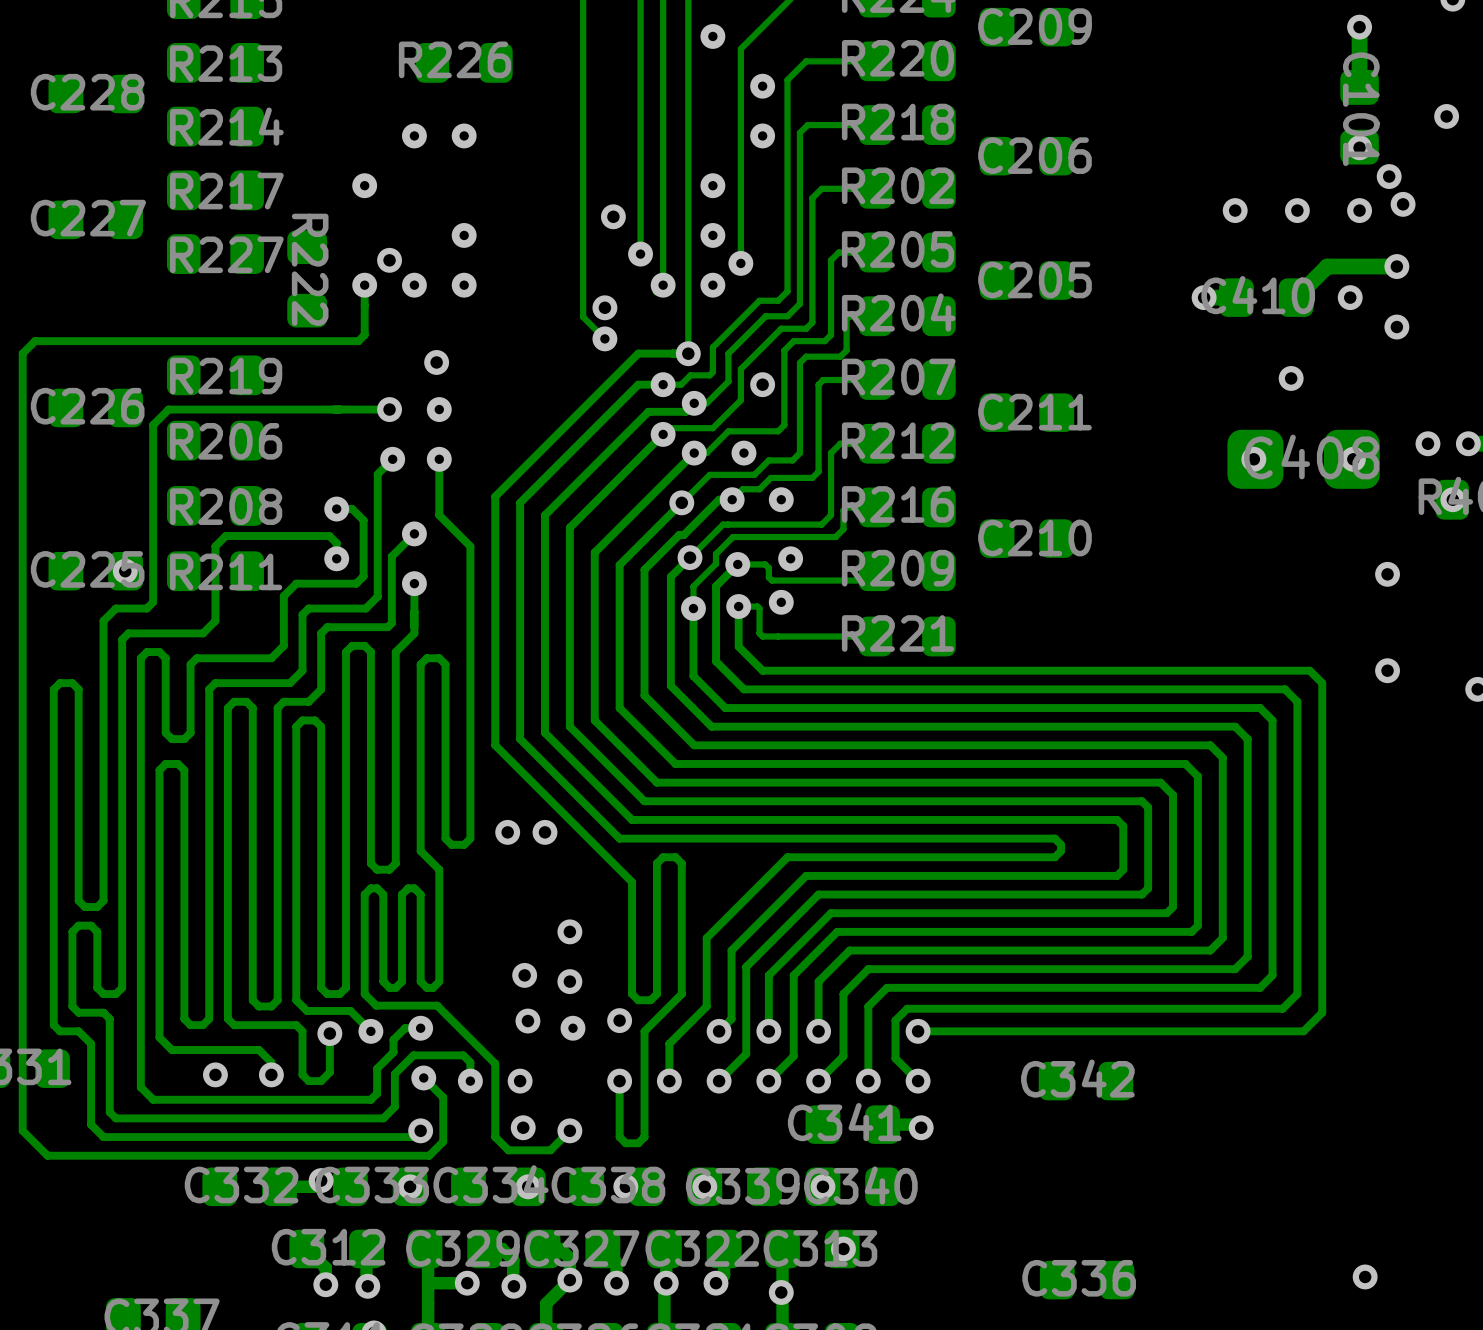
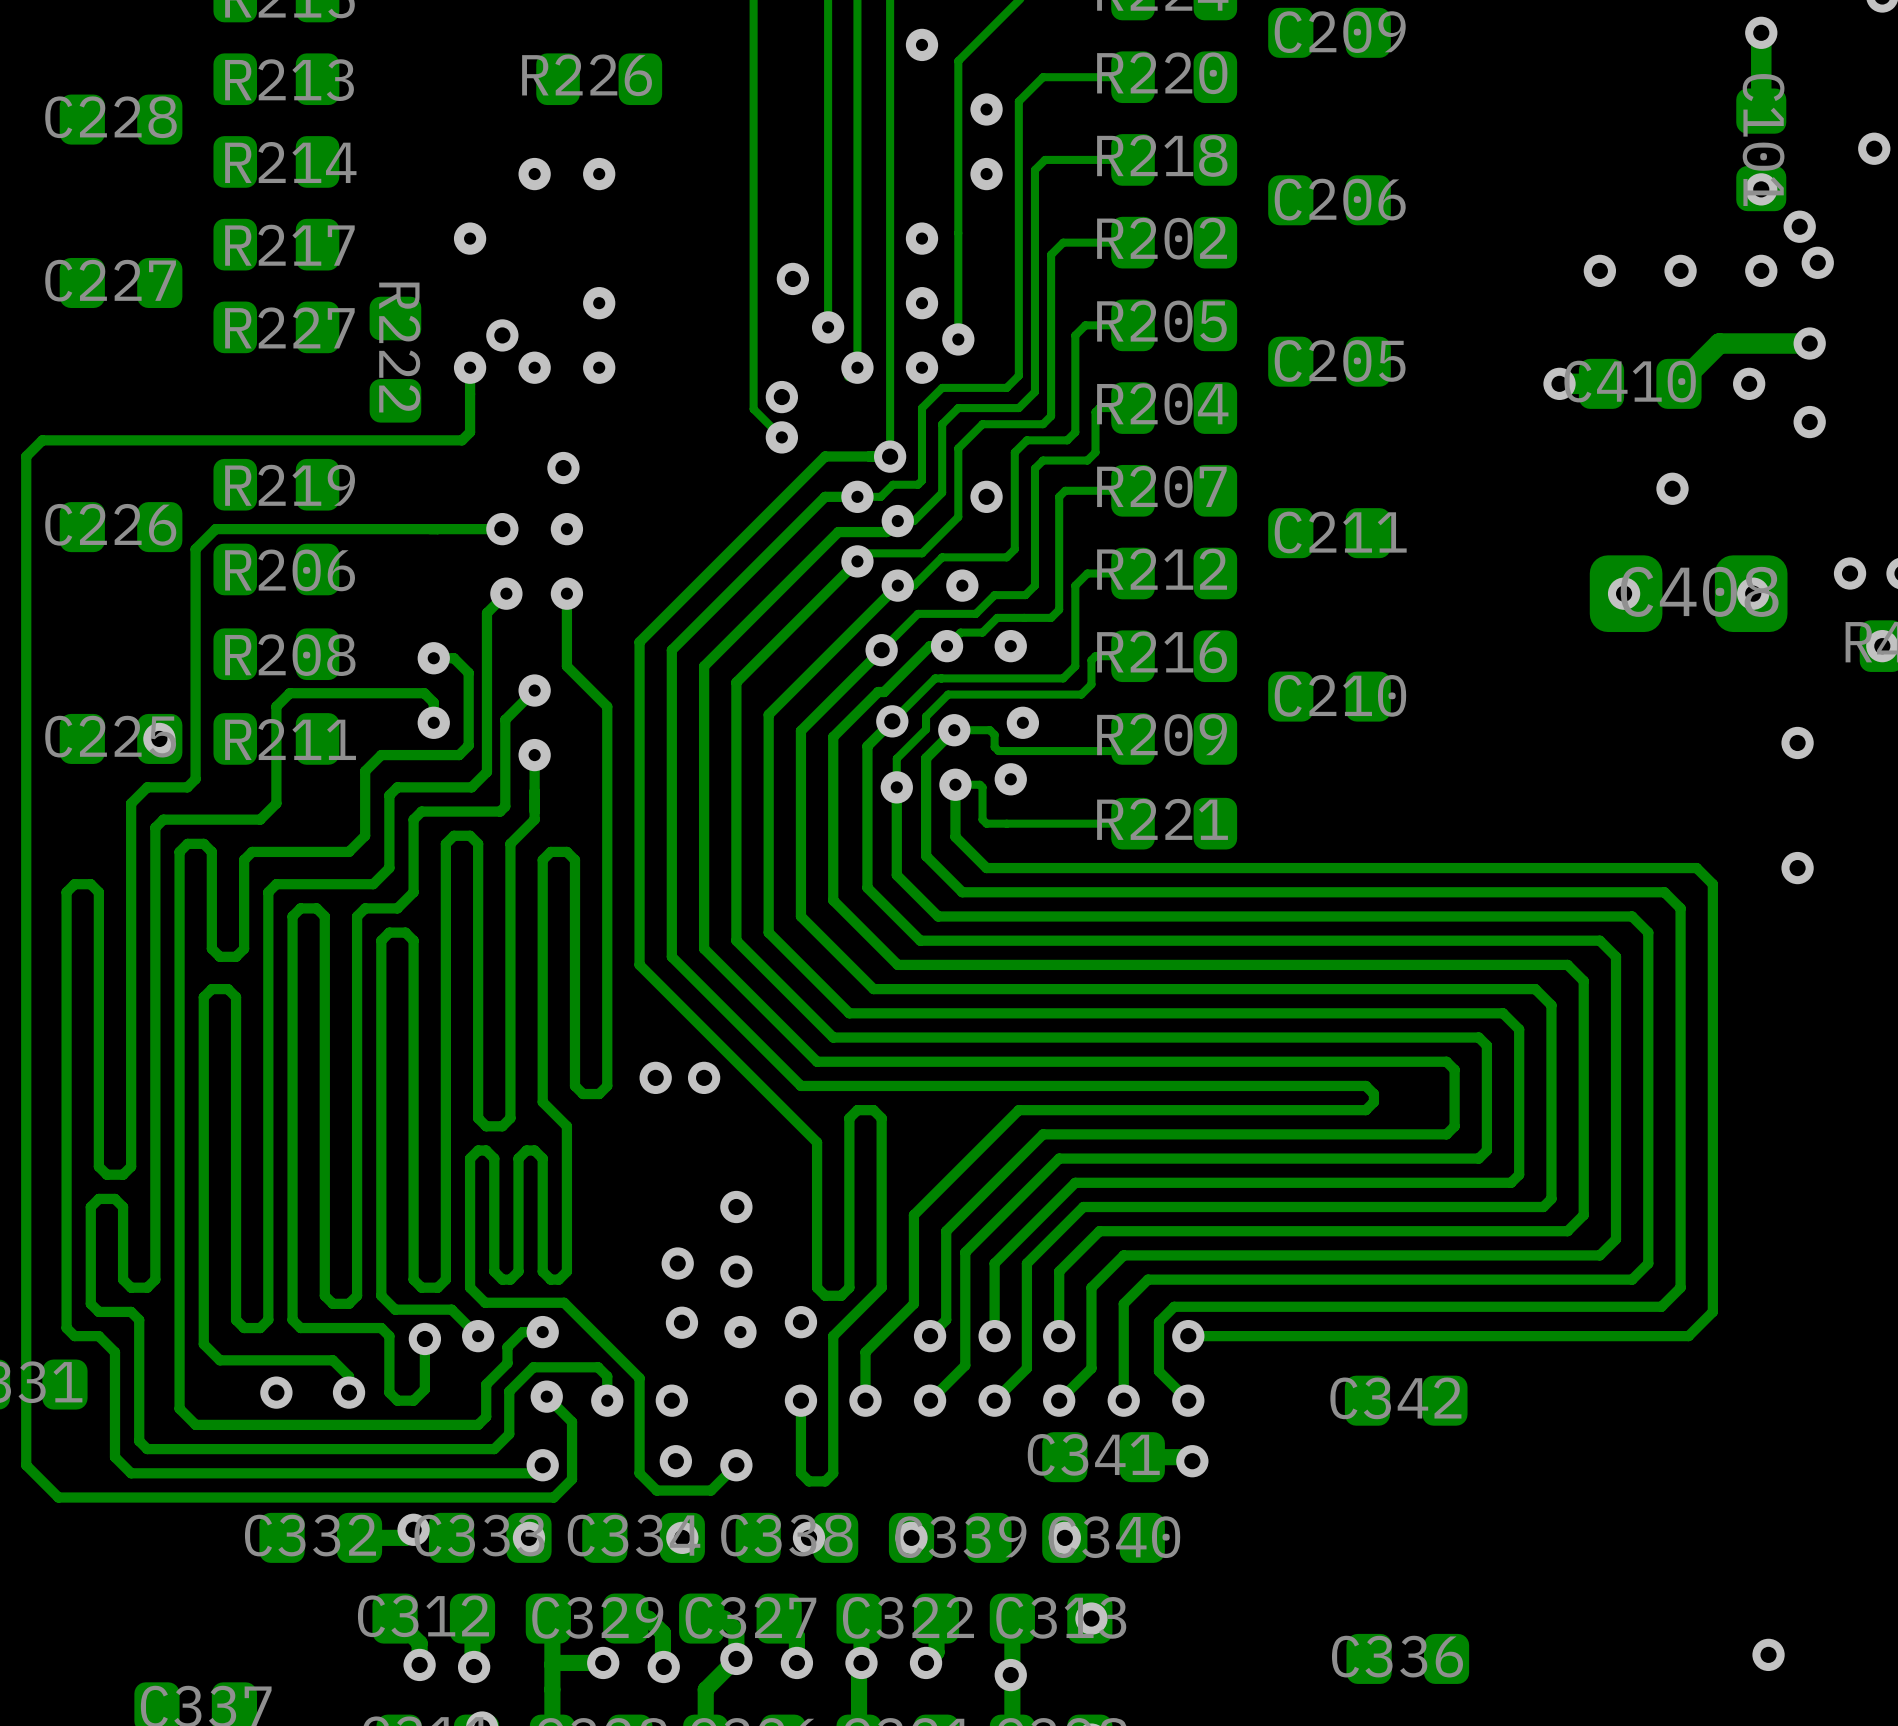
track: (759, 300) (712, 347) -> (982, 387) (942, 387) (921, 408) (921, 448)
track: (765, 316) (728, 353) -> (990, 408) (958, 408) (942, 424) (942, 456)
track: (781, 328) (740, 369) -> (1010, 424) (982, 424) (958, 448) (958, 476)

